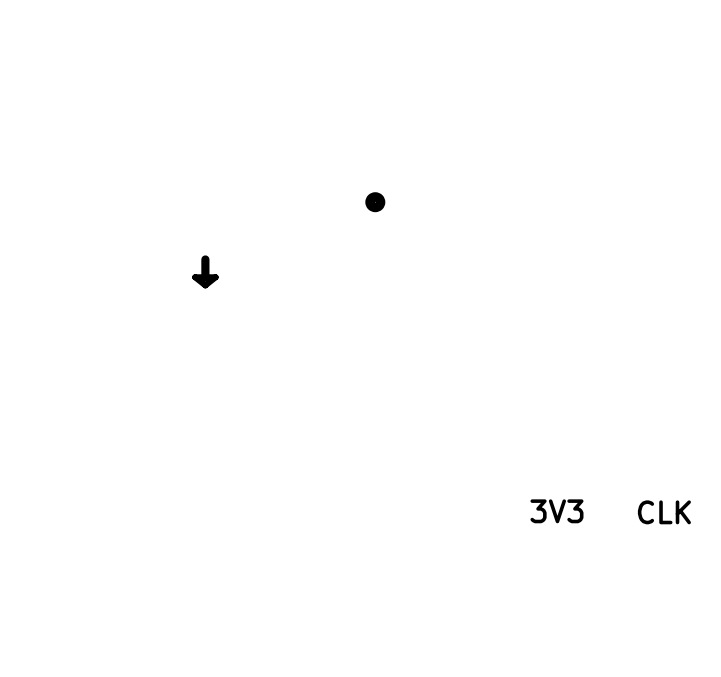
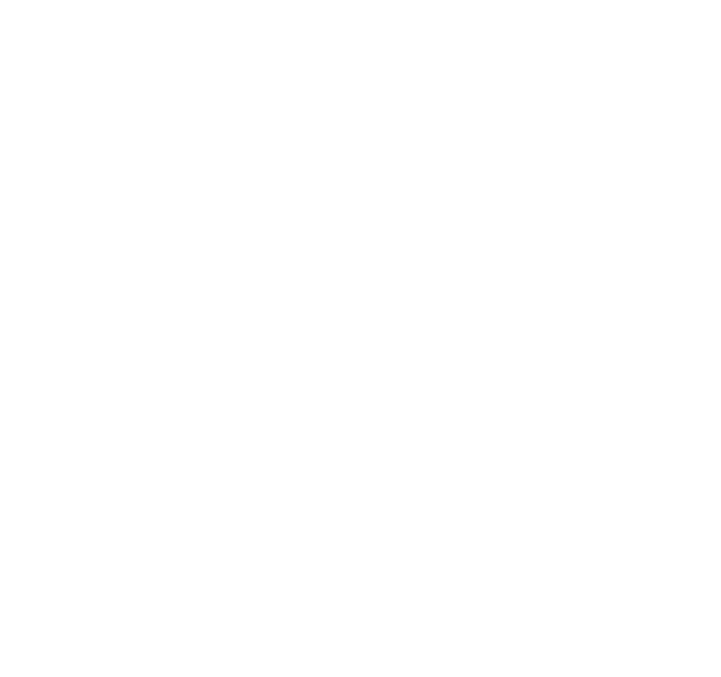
drawing: [365, 192, 386, 213] -> none
line: (205, 259) (205, 277) (215, 277) (205, 285) (195, 277) (203, 277) -> none
text: 3V3 (556, 511) -> none
text: CLK (664, 512) -> none

